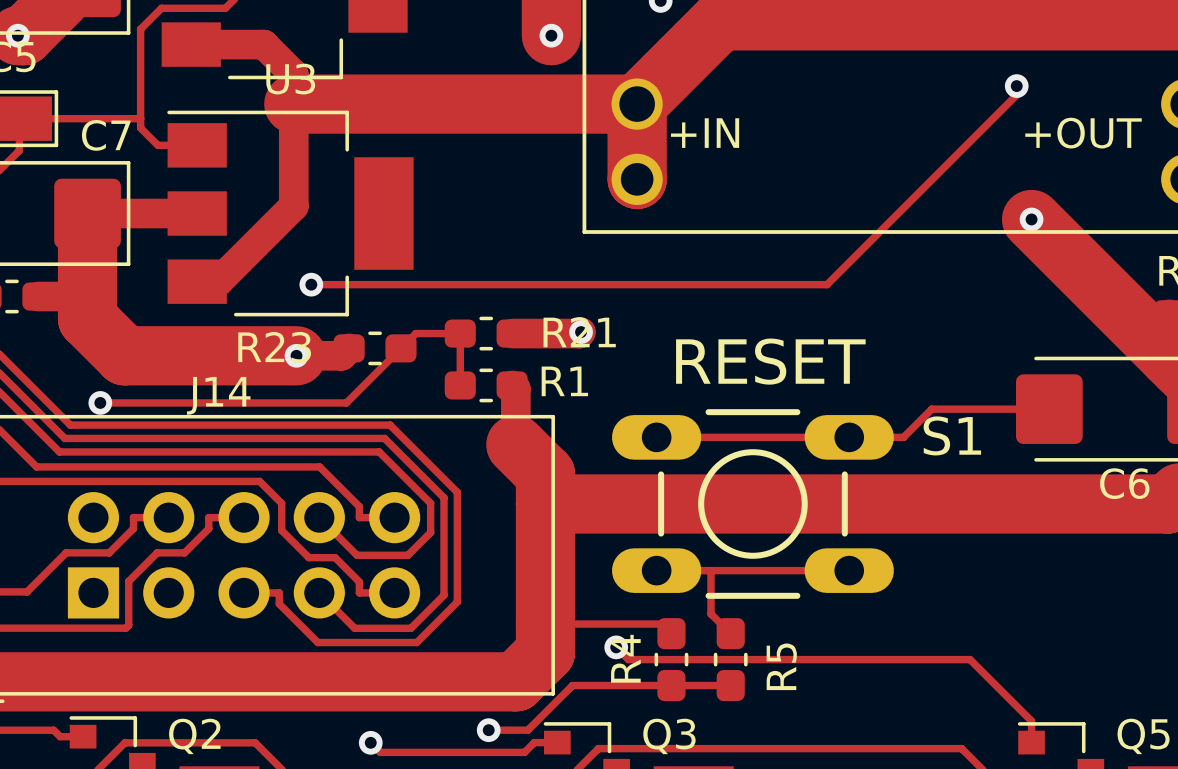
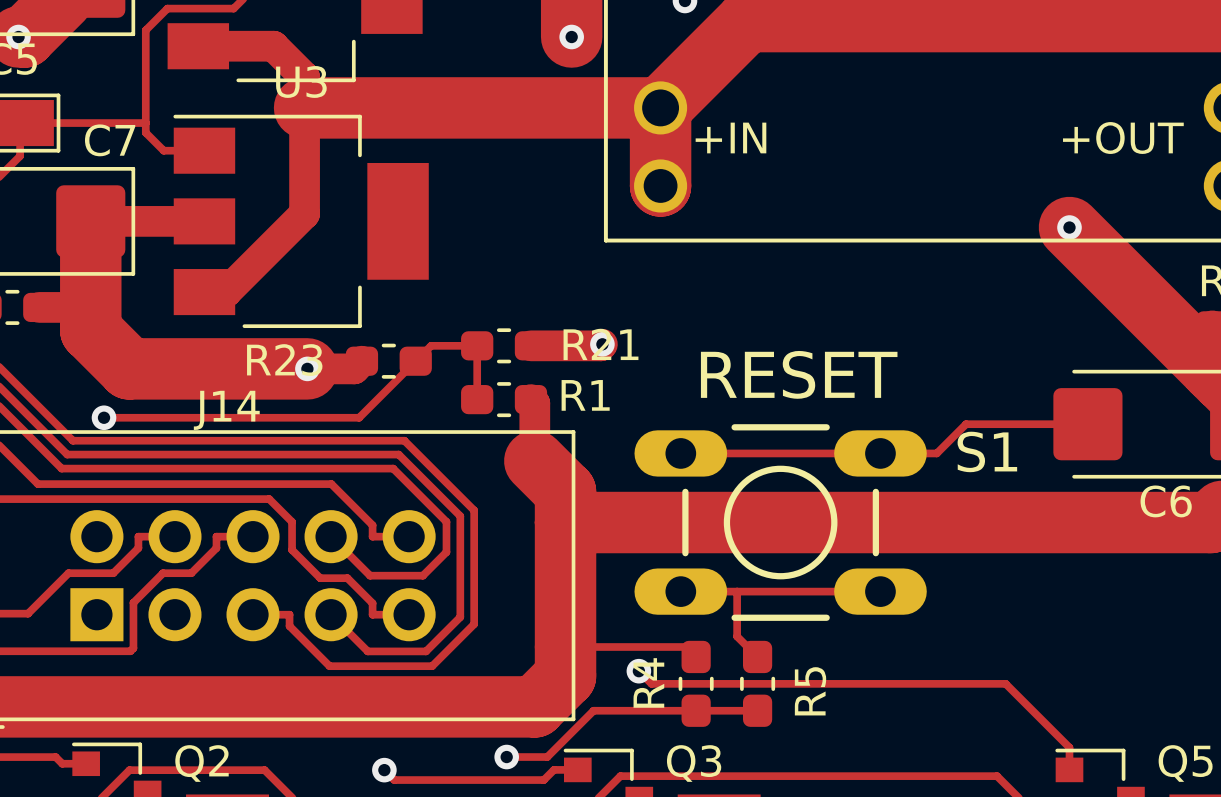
track: (1016, 86) (1016, 94) (827, 284) (311, 284) -> none
via: (1016, 86) -> none
via: (311, 284) -> none

